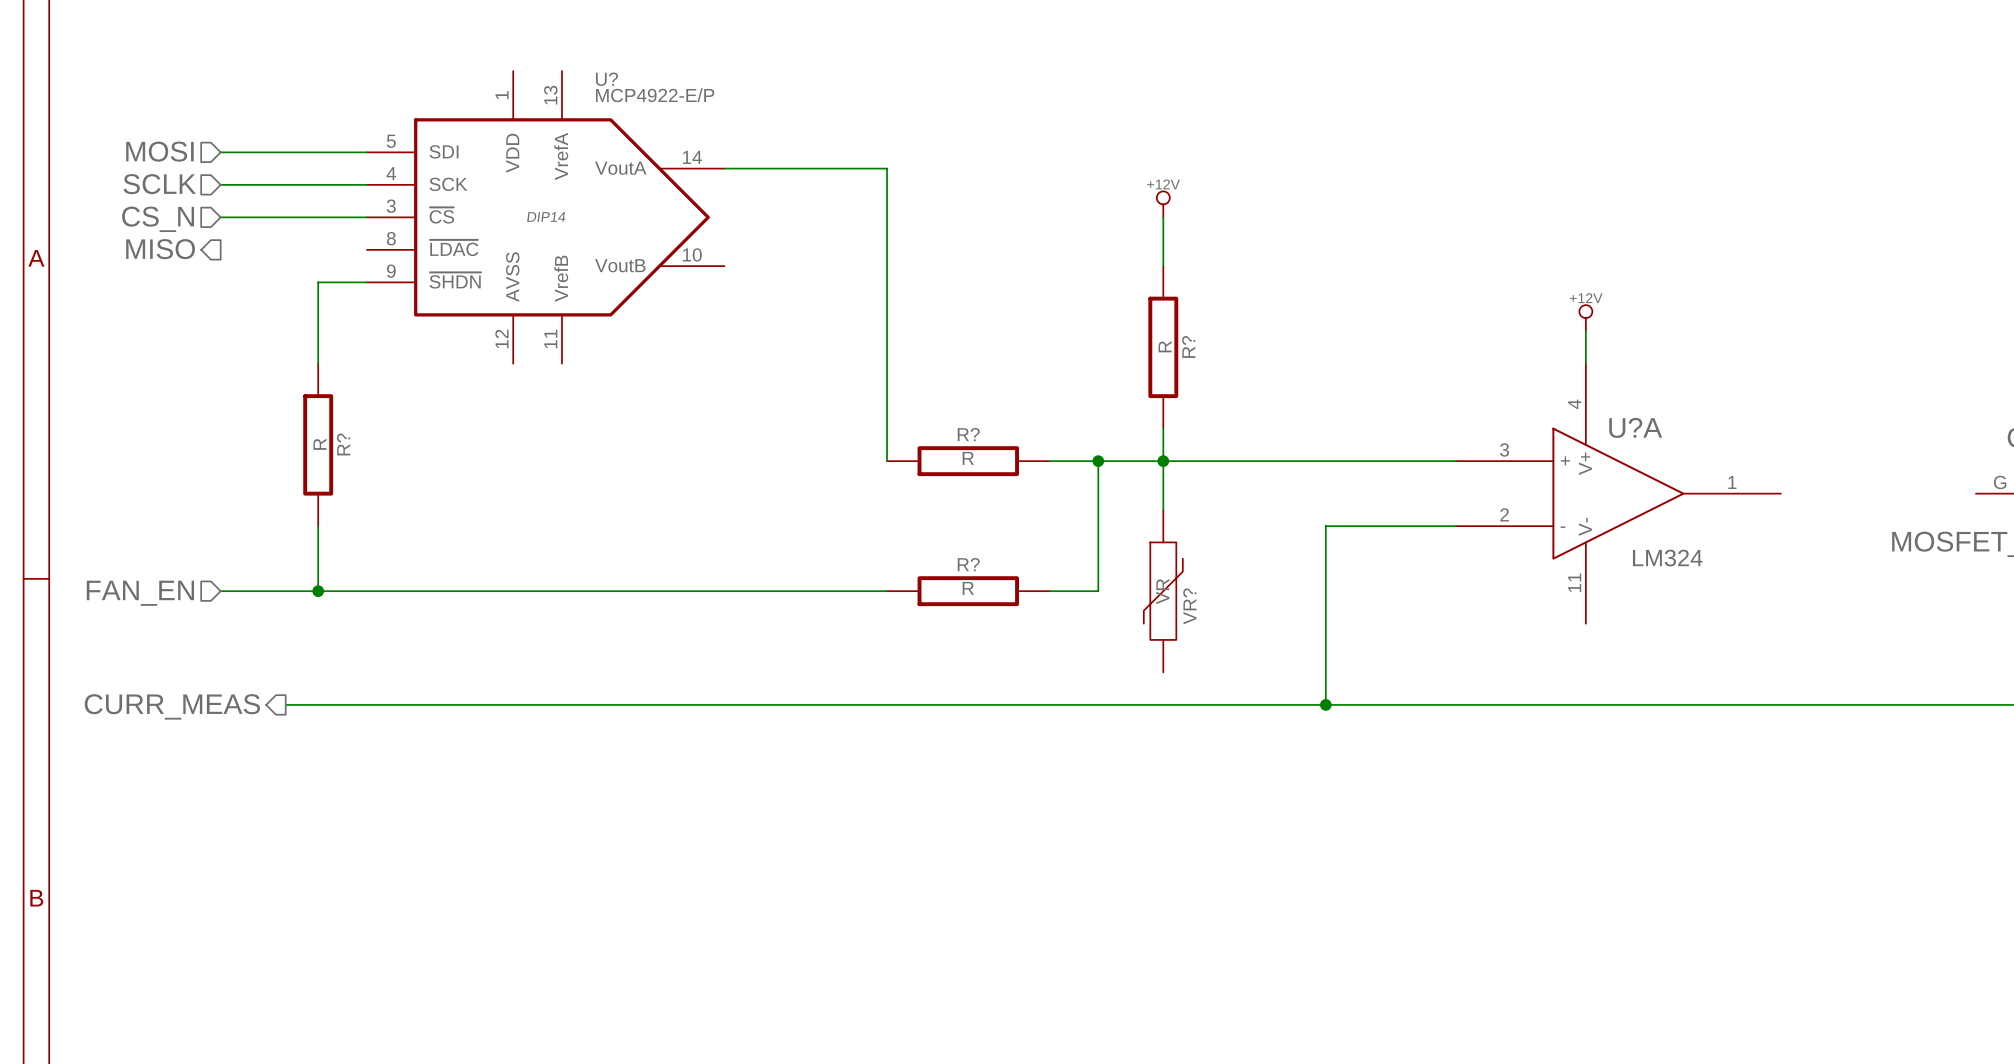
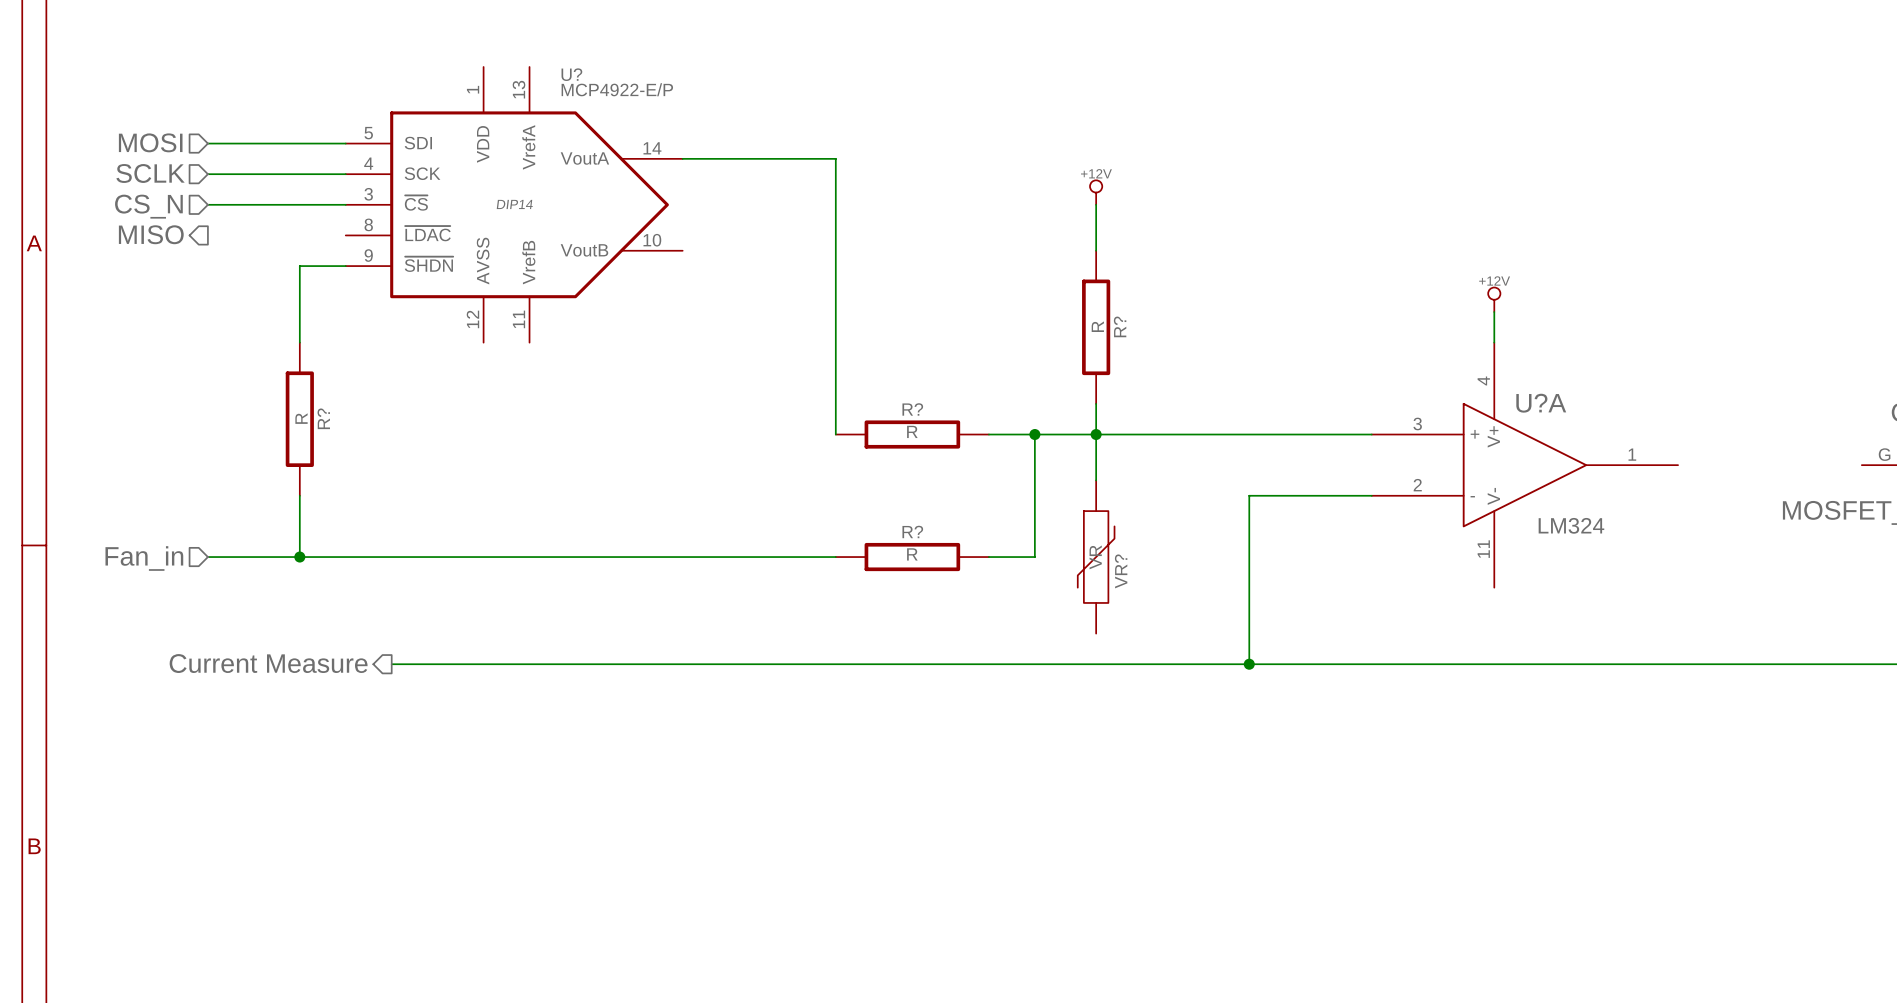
hierarchical label: FAN_EN (140, 593) -> Fan_in (144, 558)
wire: (285, 704) (415, 704) -> none
hierarchical label: none -> Current Measure (268, 663)
hierarchical label: CURR_MEAS (172, 706) -> none

